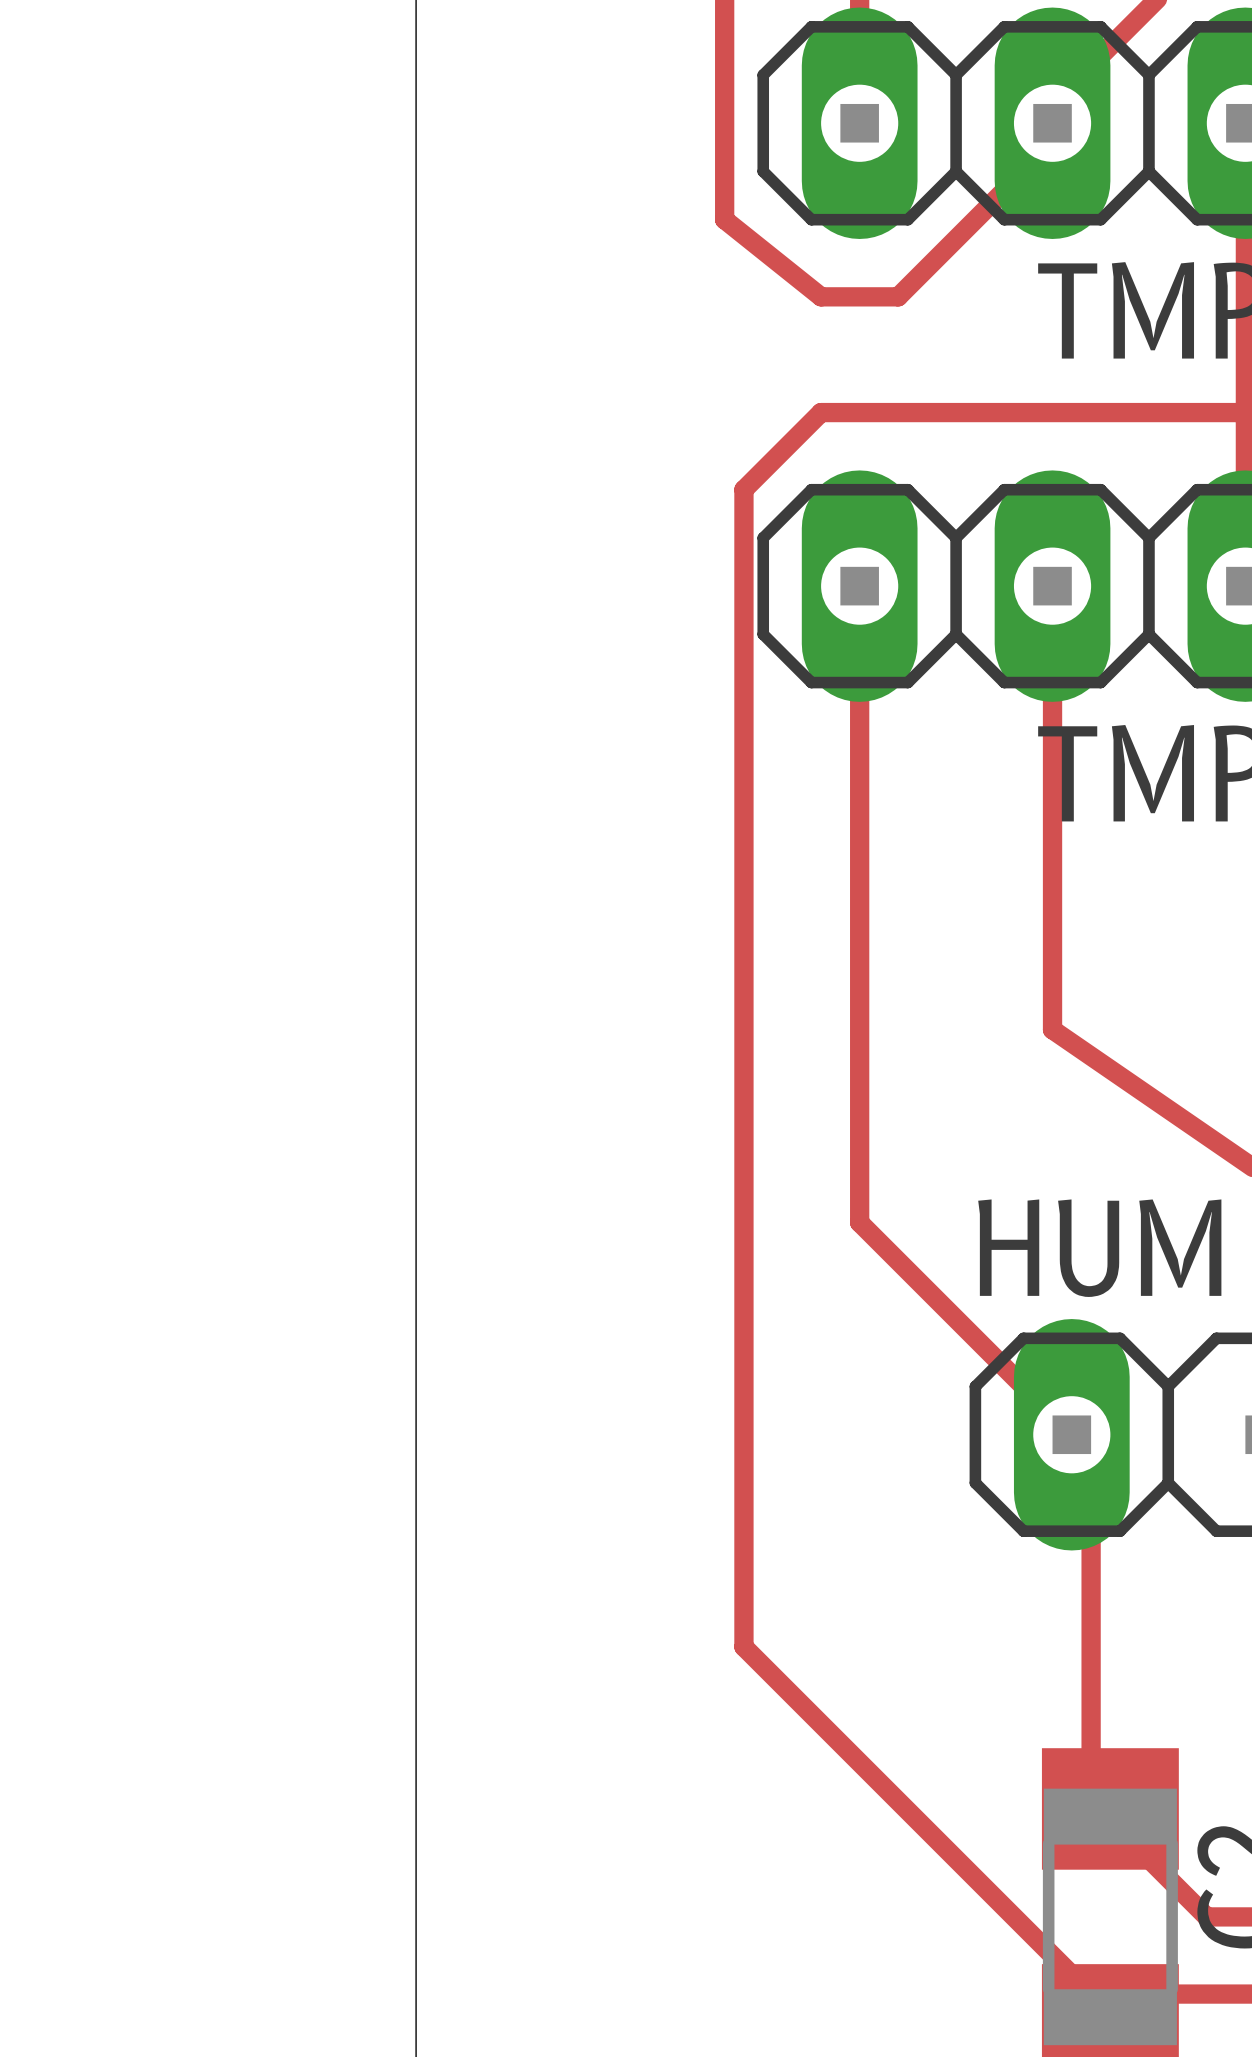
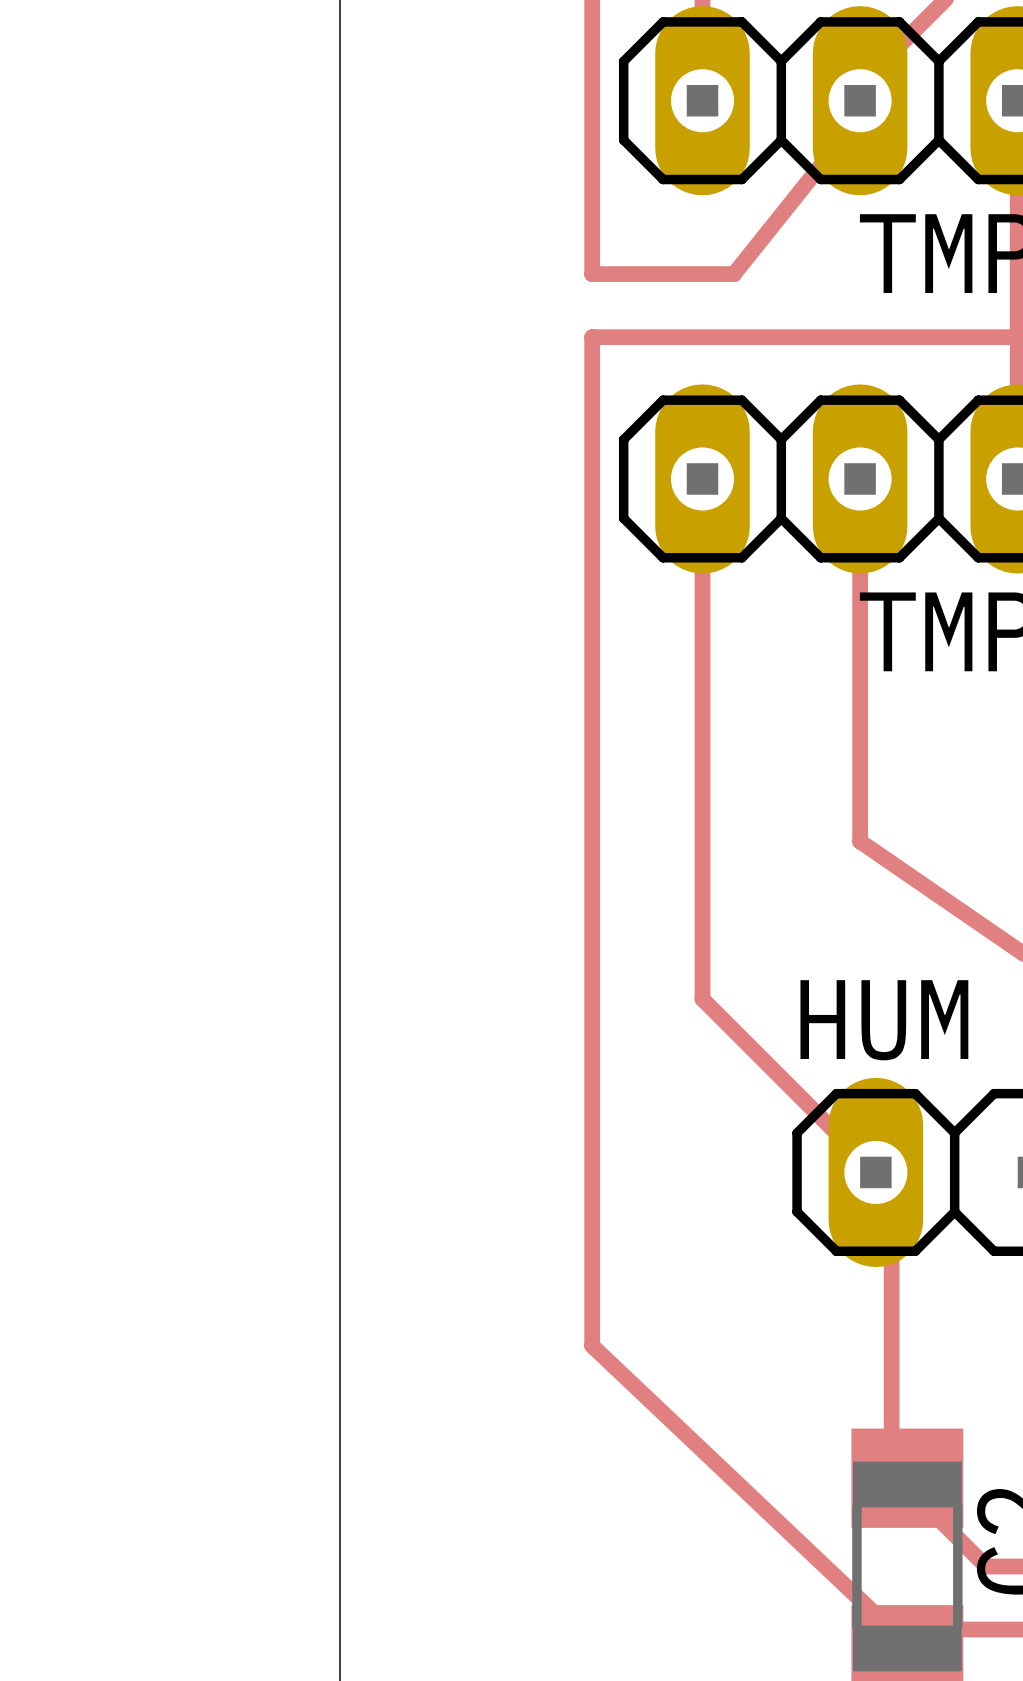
top track: (1052, 142) (898, 296) (821, 296) (724, 219) -> (860, 116) (734, 274) (592, 274) (592, 179)
top track: (821, 412) (743, 489) (743, 1646) (1091, 1994) -> (670, 337) (592, 337) (592, 1345) (891, 1629)

